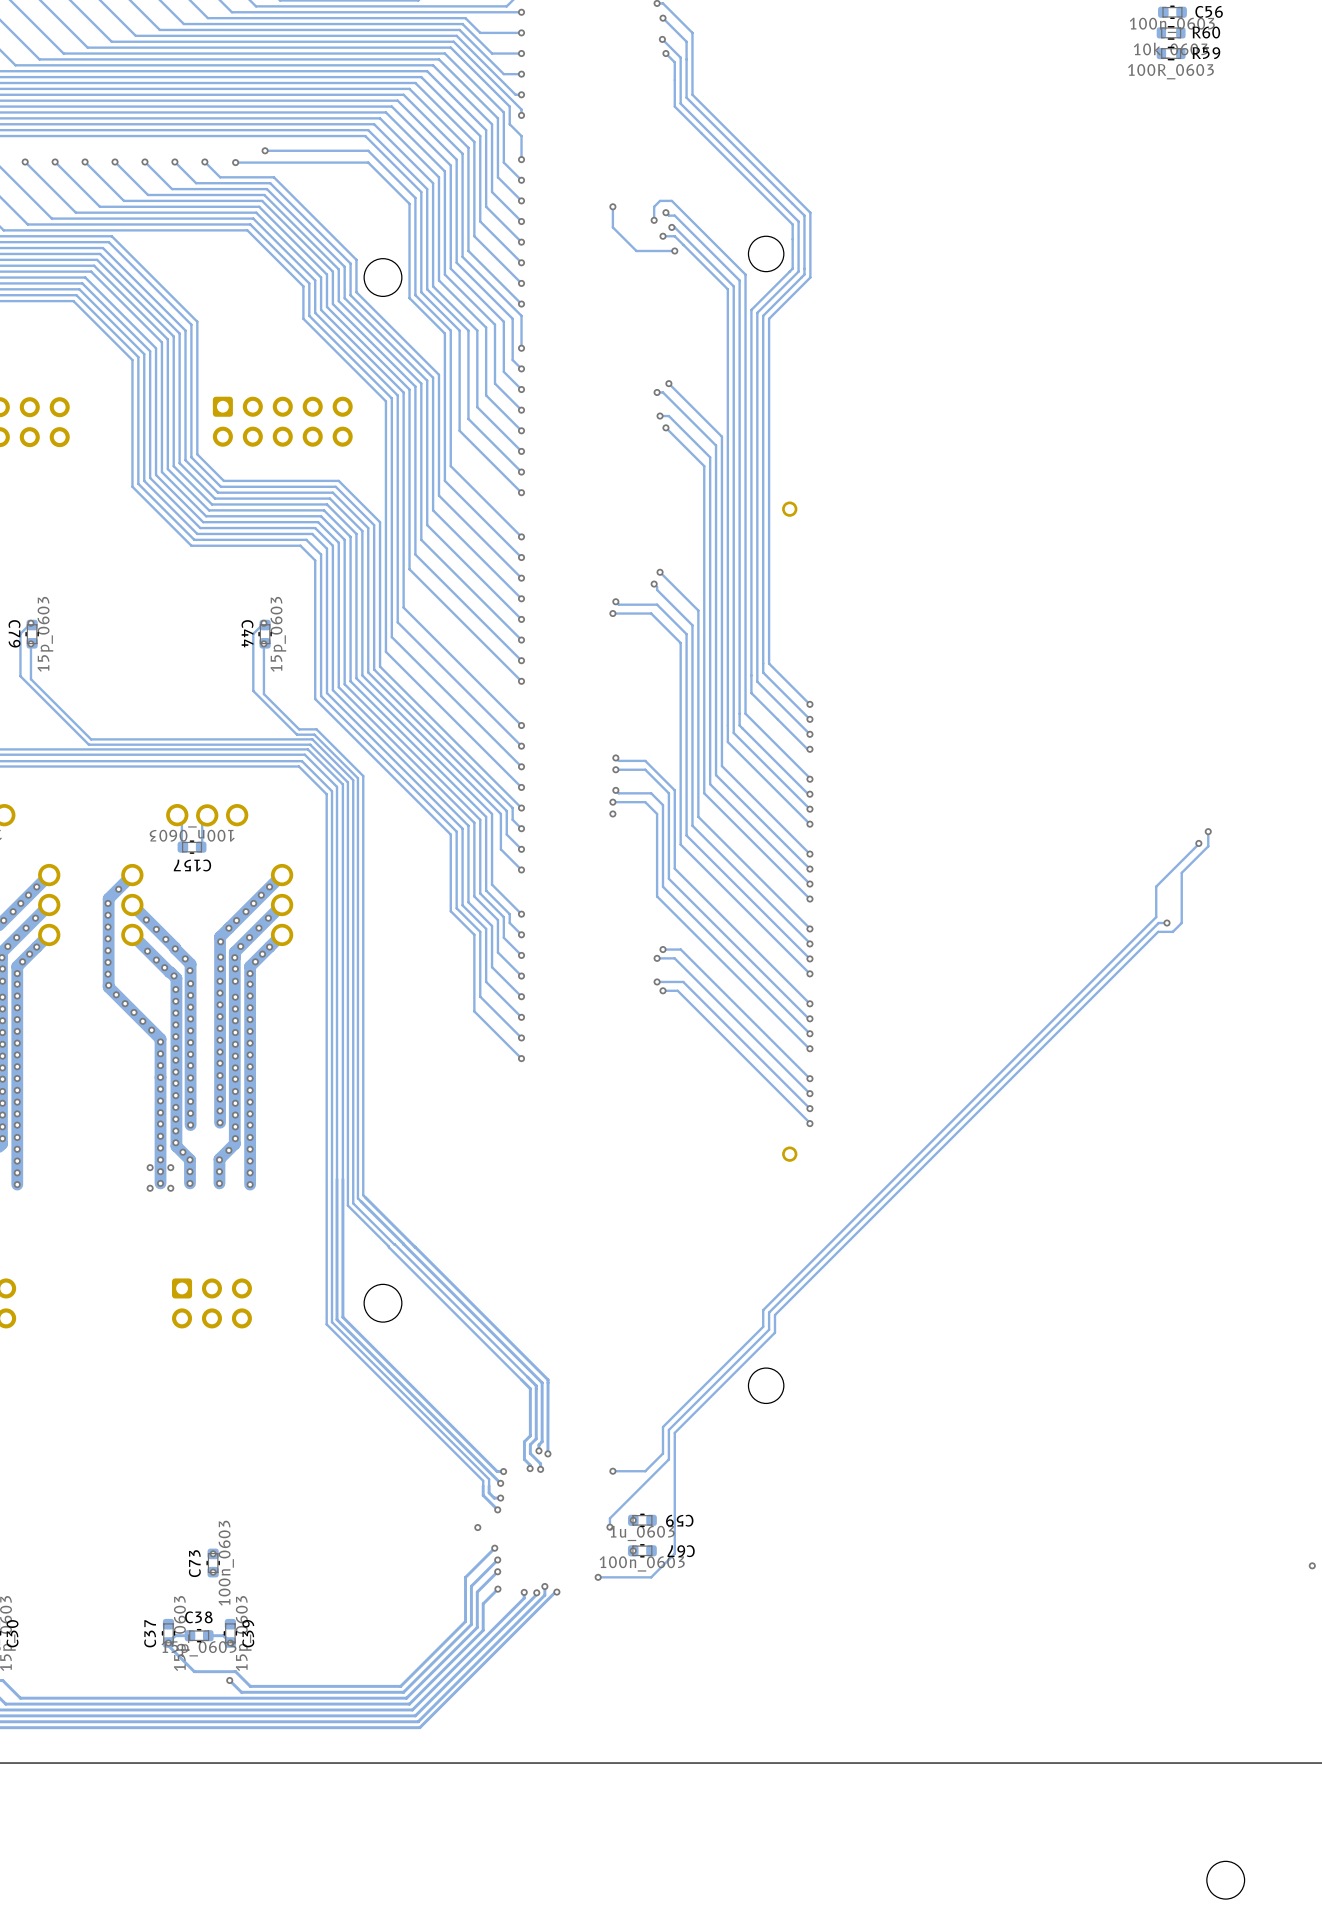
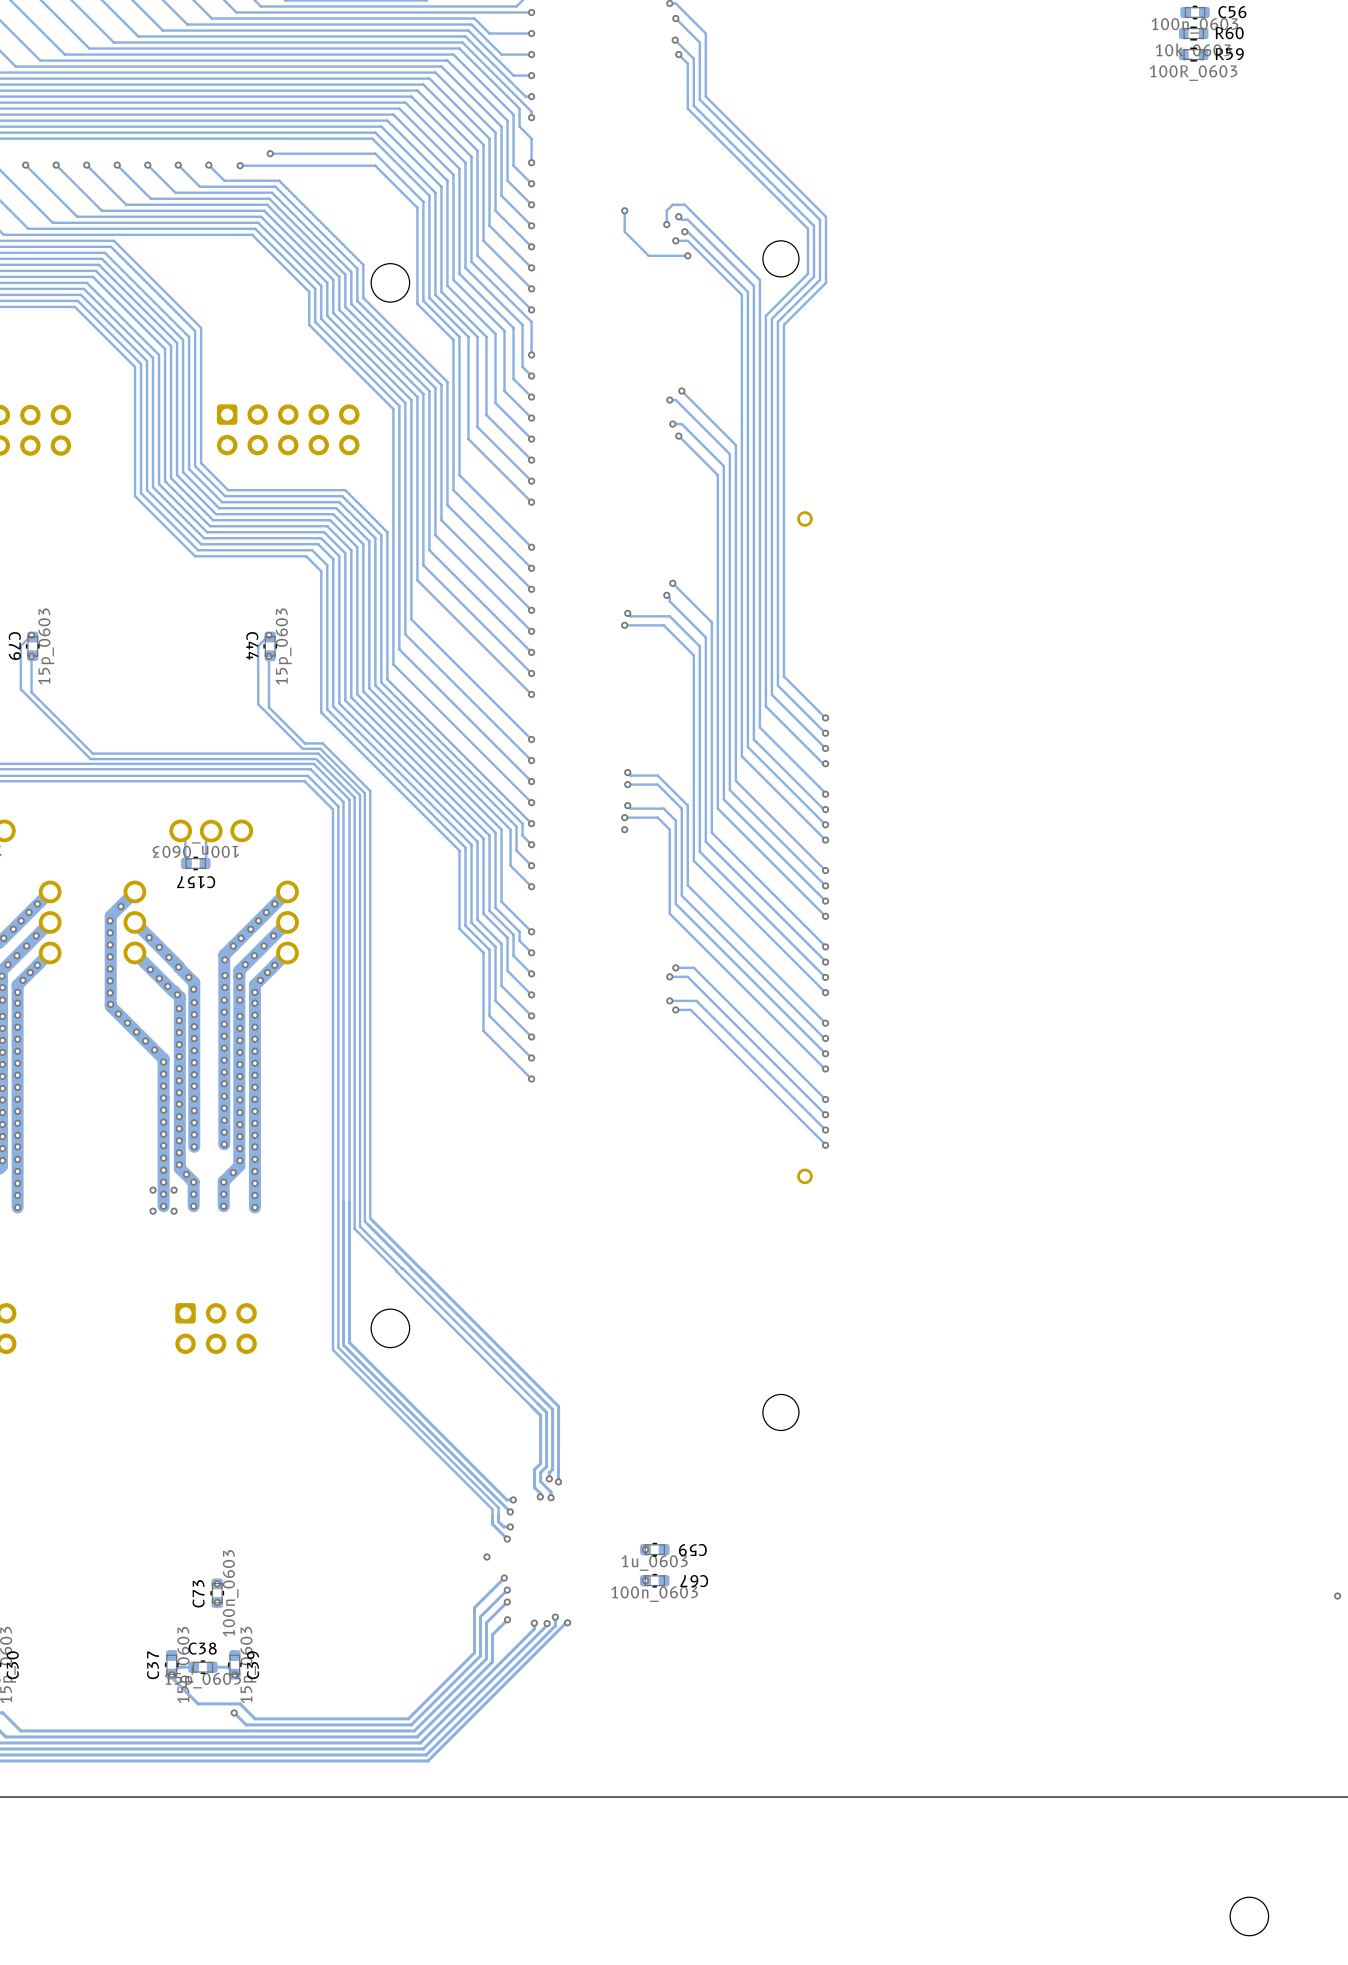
track: (1208, 831) (1208, 846) (1181, 872) (1181, 923) (1172, 931) (1158, 931) (774, 1315) (774, 1332) (674, 1432) (674, 1553) (651, 1577) (598, 1577) -> none
via: (1208, 831) -> none
track: (1198, 843) (1156, 886) (1156, 917) (763, 1310) (763, 1326) (662, 1427) (662, 1453) (645, 1471) (612, 1471) -> none
via: (1198, 843) -> none
track: (1167, 923) (1158, 923) (769, 1312) (769, 1329) (668, 1429) (668, 1459) (609, 1518) (609, 1527) -> none
via: (1167, 923) -> none
via: (612, 1471) -> none
via: (609, 1527) -> none
via: (598, 1577) -> none

